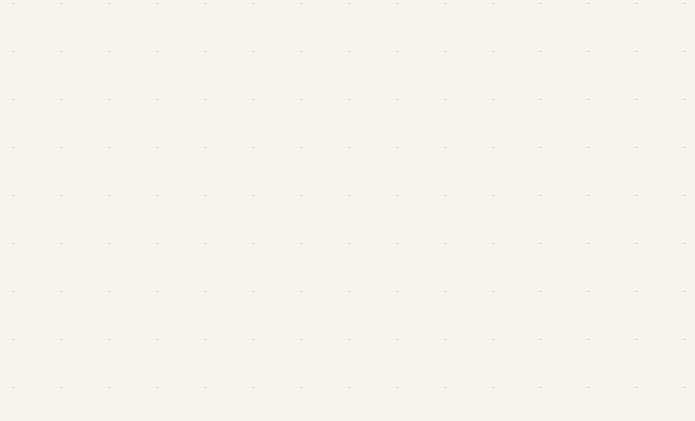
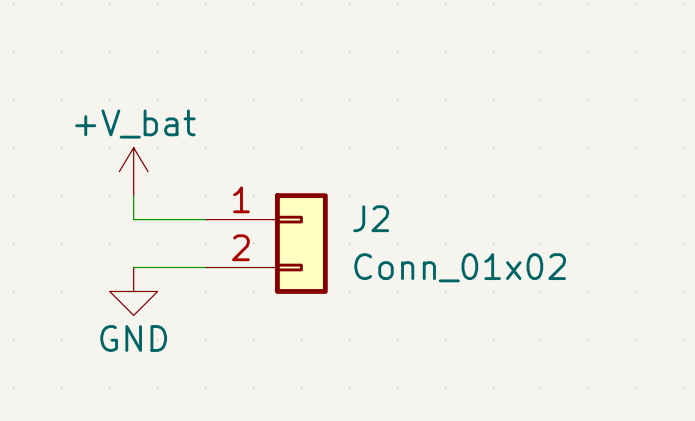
power symbol: none -> +V_bat (133, 171)
wire: none -> (133, 195) (133, 219) (205, 219)
J2: none -> Conn_01x02 (266, 243)
wire: none -> (133, 267) (205, 267)
power symbol: none -> GND (133, 291)

